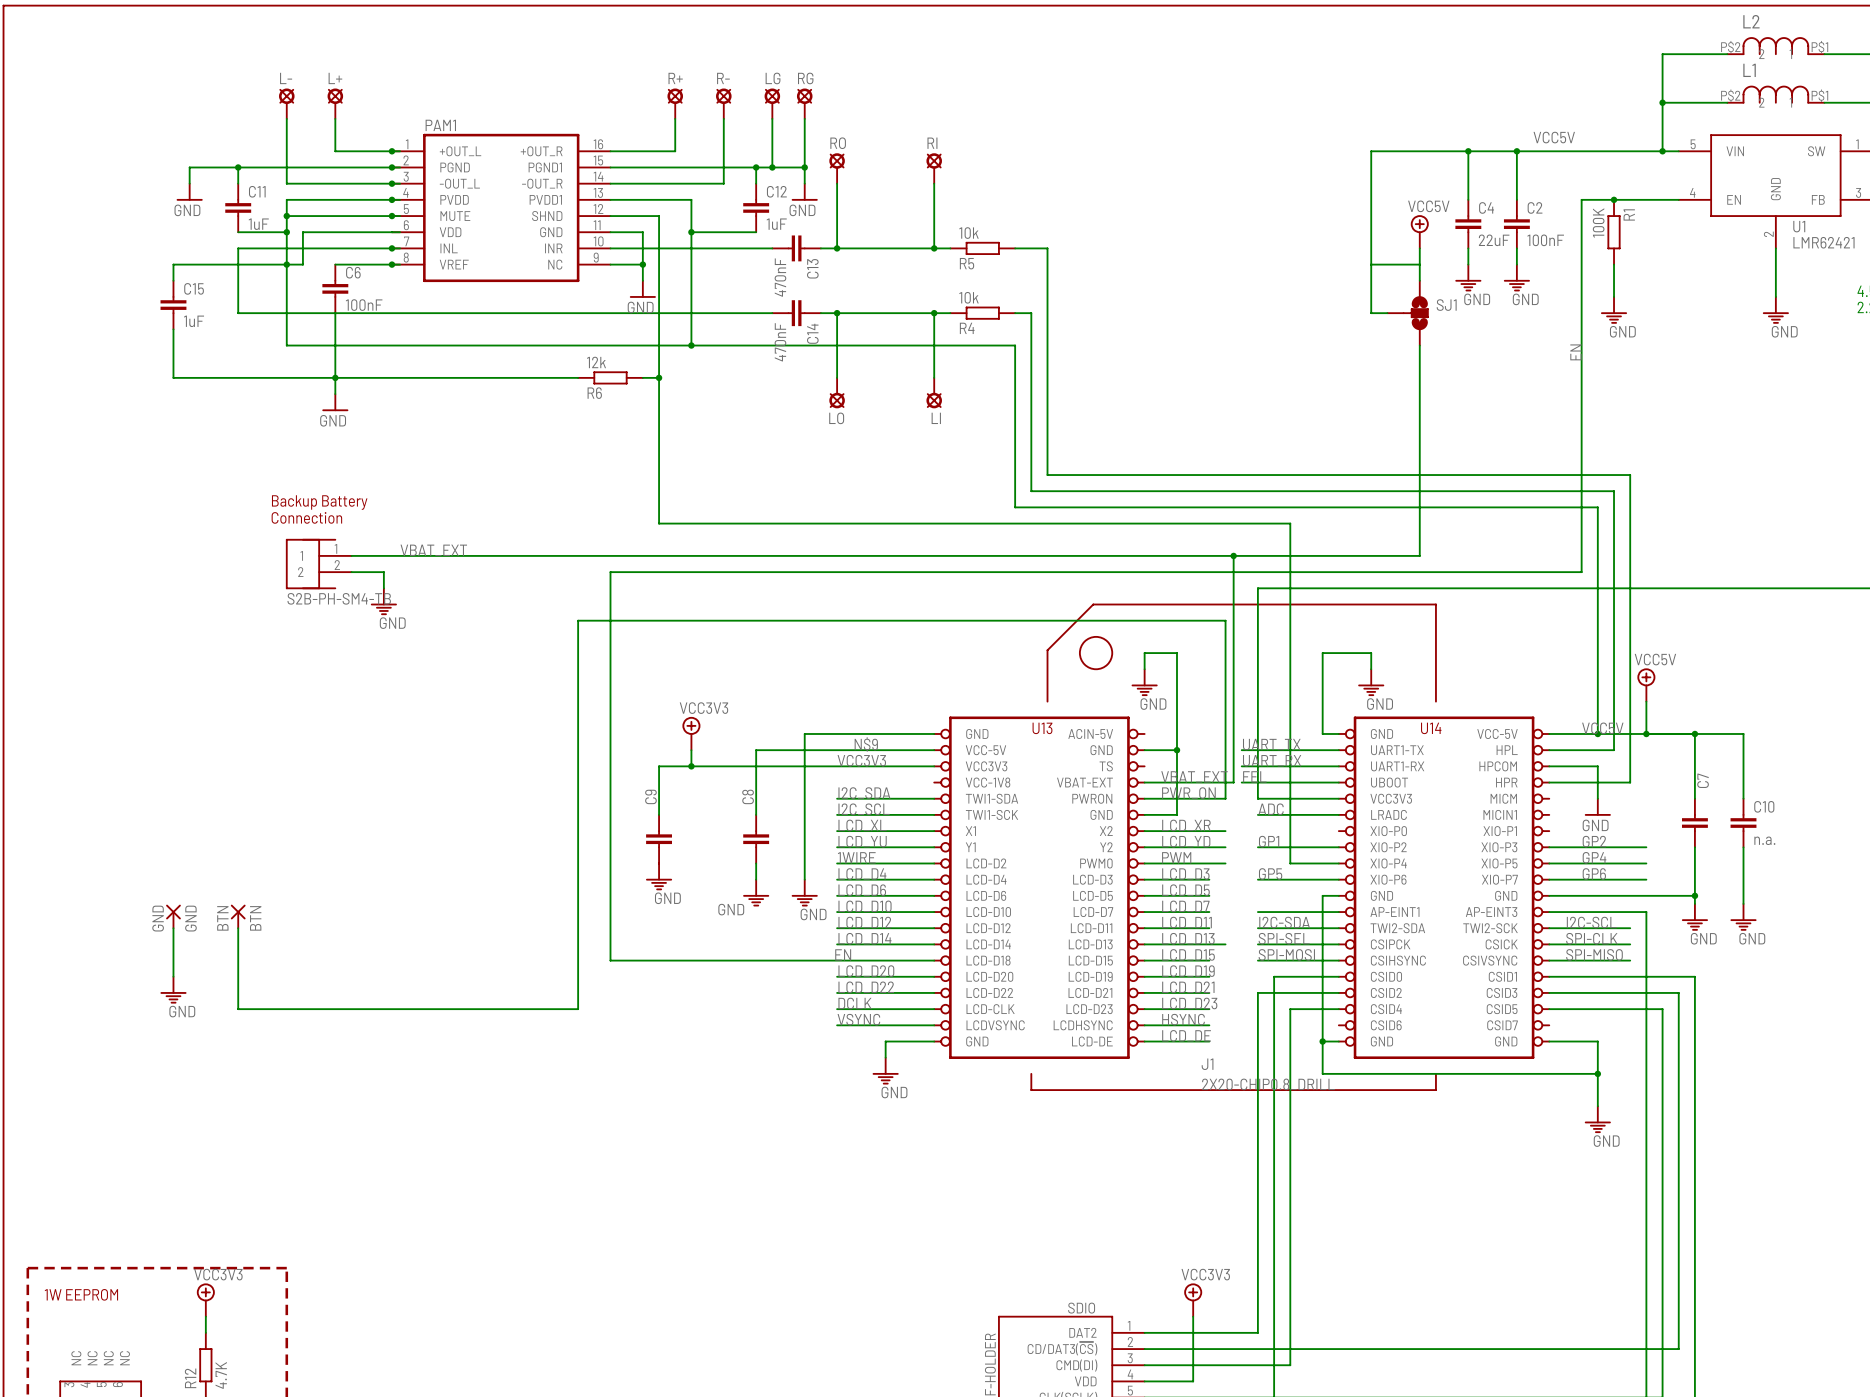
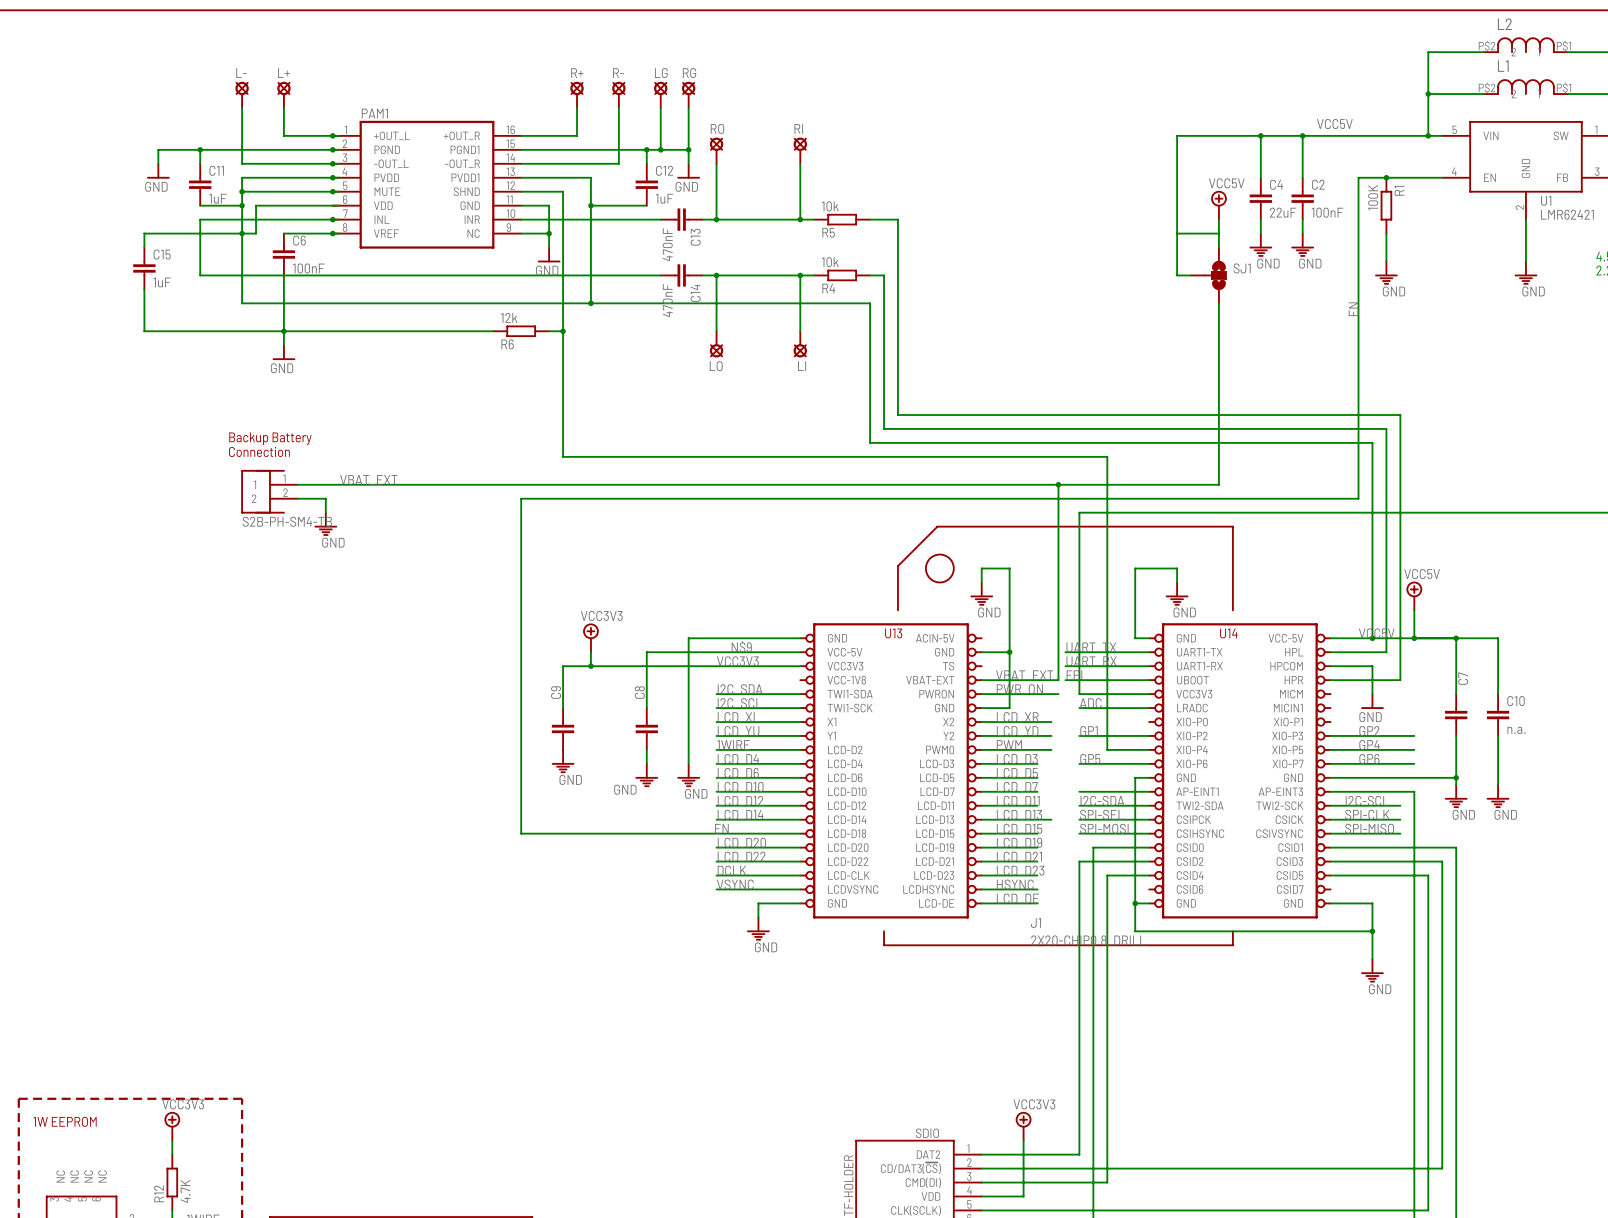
wire: (1225, 798) (1225, 620) (578, 620) (578, 1009) (238, 1009) (238, 928) -> (1051, 694) (1058, 694)
GND: GND (173, 916) -> none
BTN: BTN (238, 916) -> none
wire: (173, 928) (173, 976) -> none
power symbol: GND (173, 990) -> none

